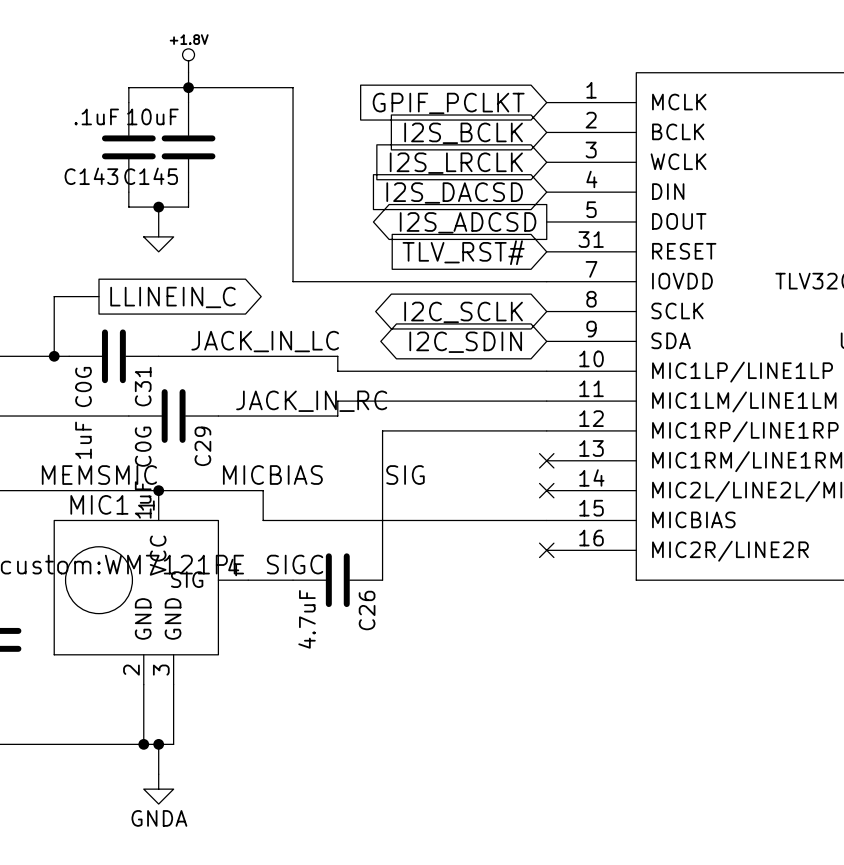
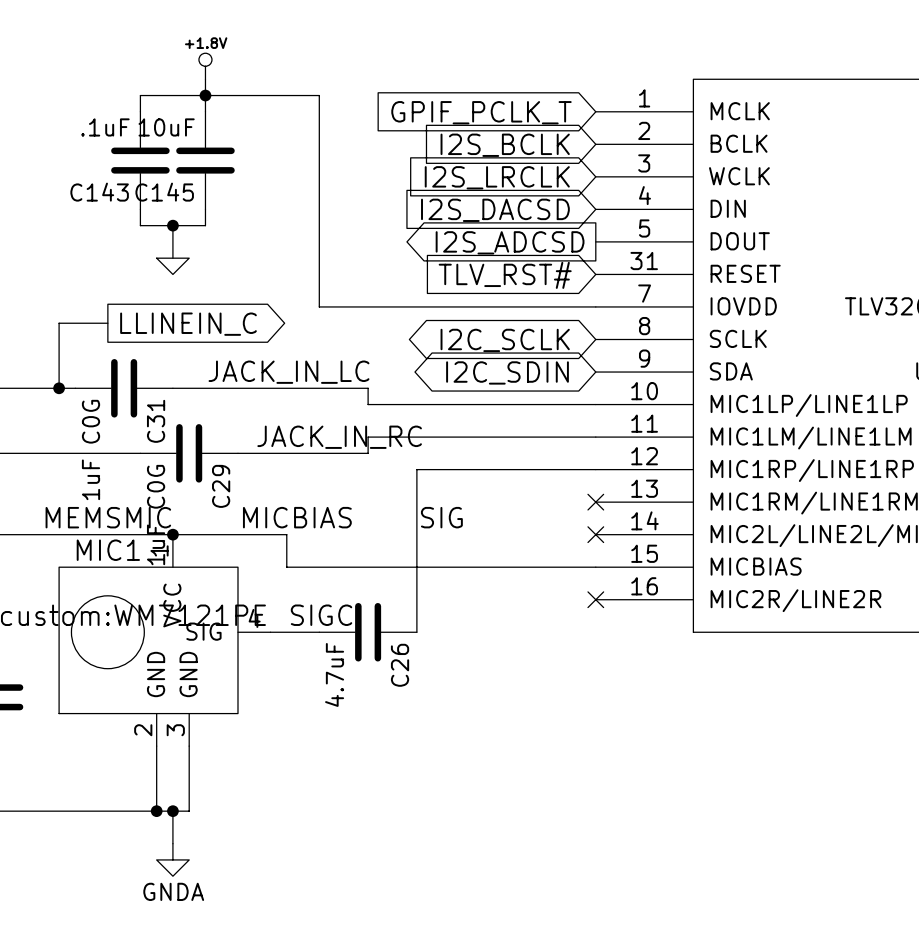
global label: GPIF_PCLKT (448, 103) -> GPIF_PCLK_T (481, 112)

